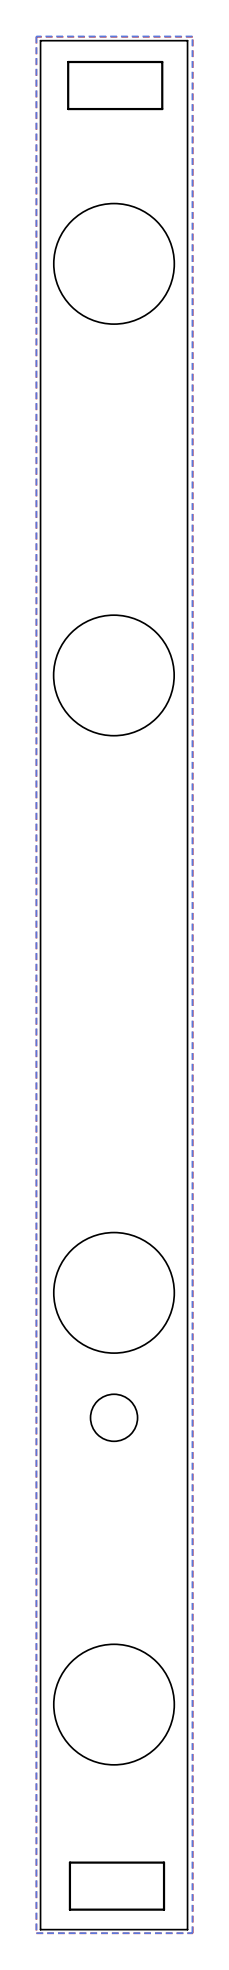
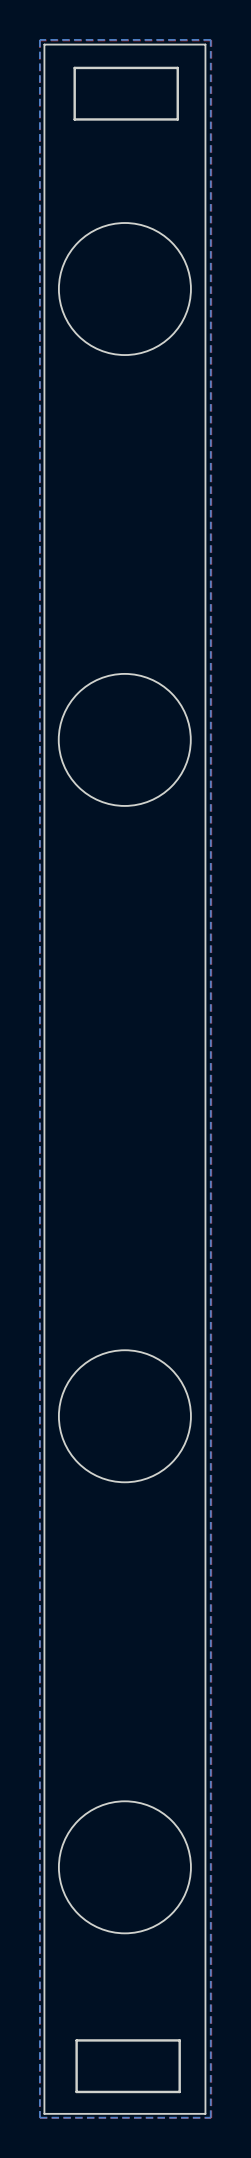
round board edge: [89, 1393, 139, 1443] -> none

